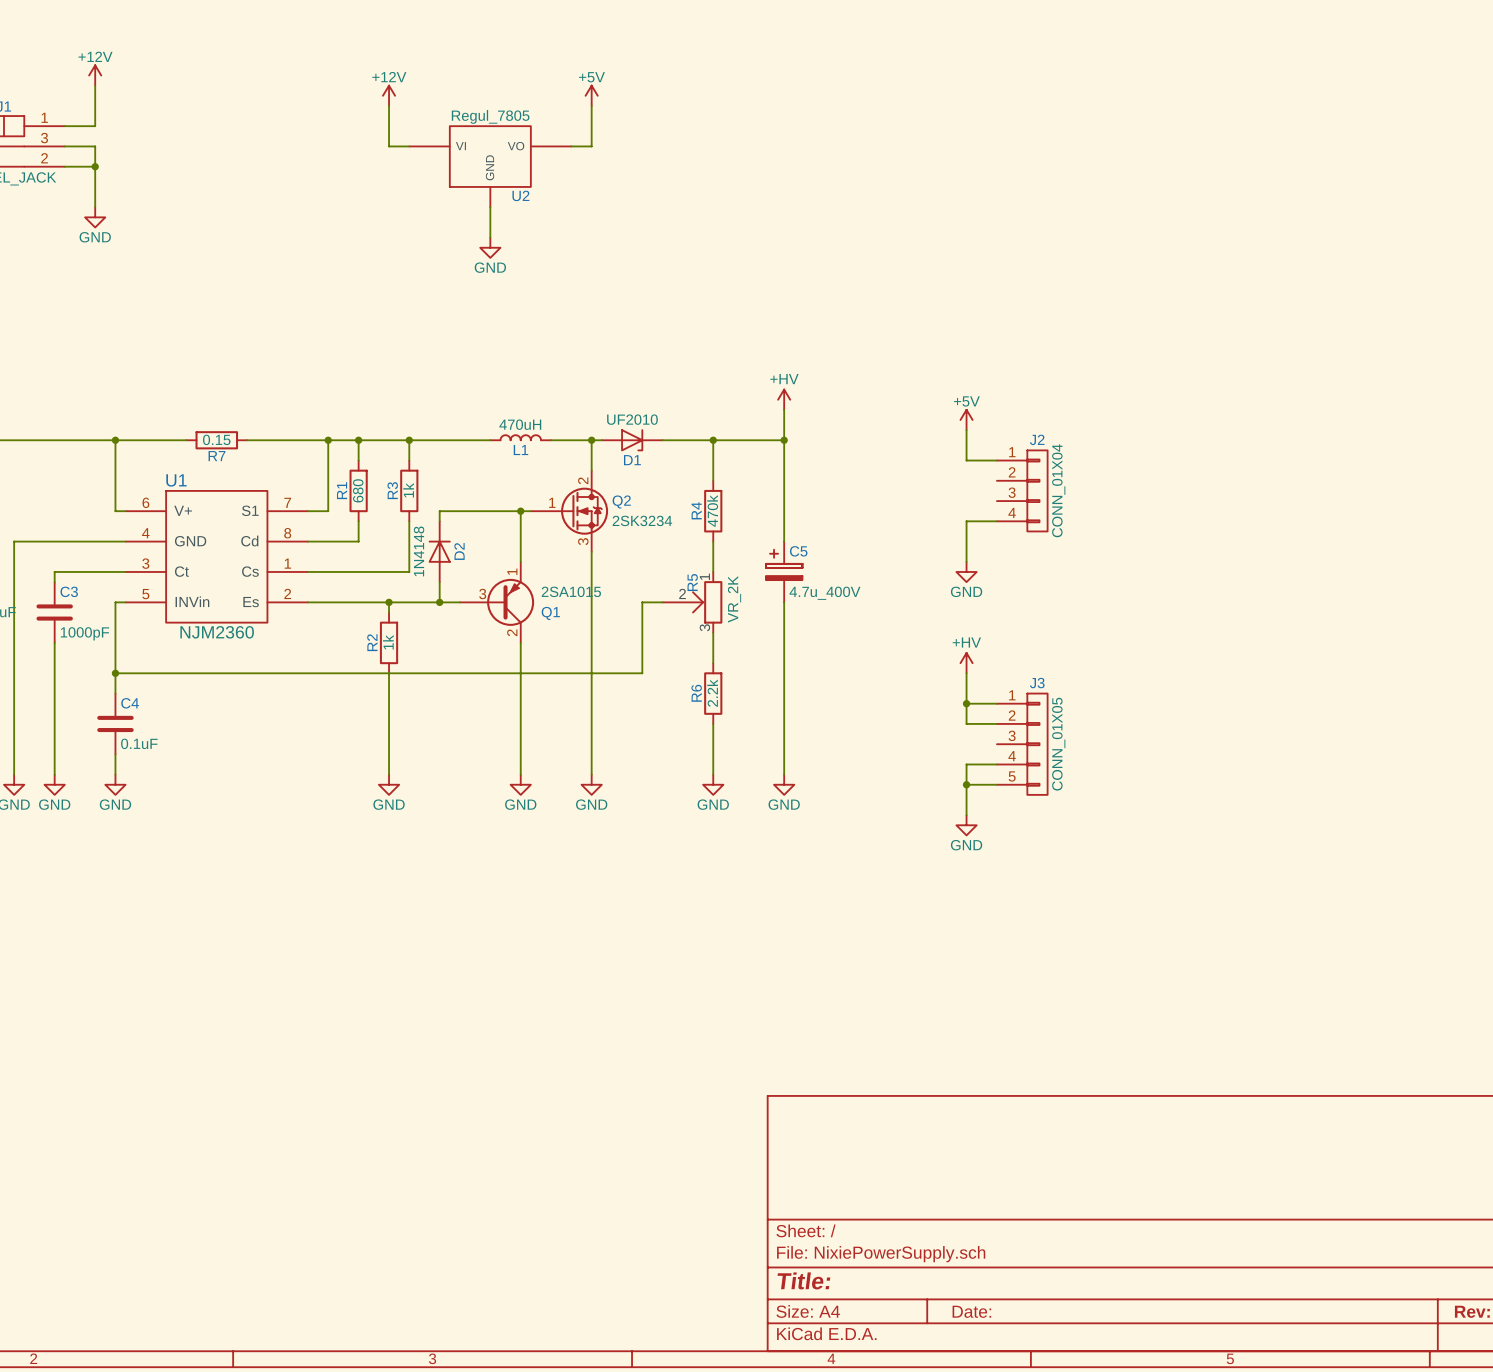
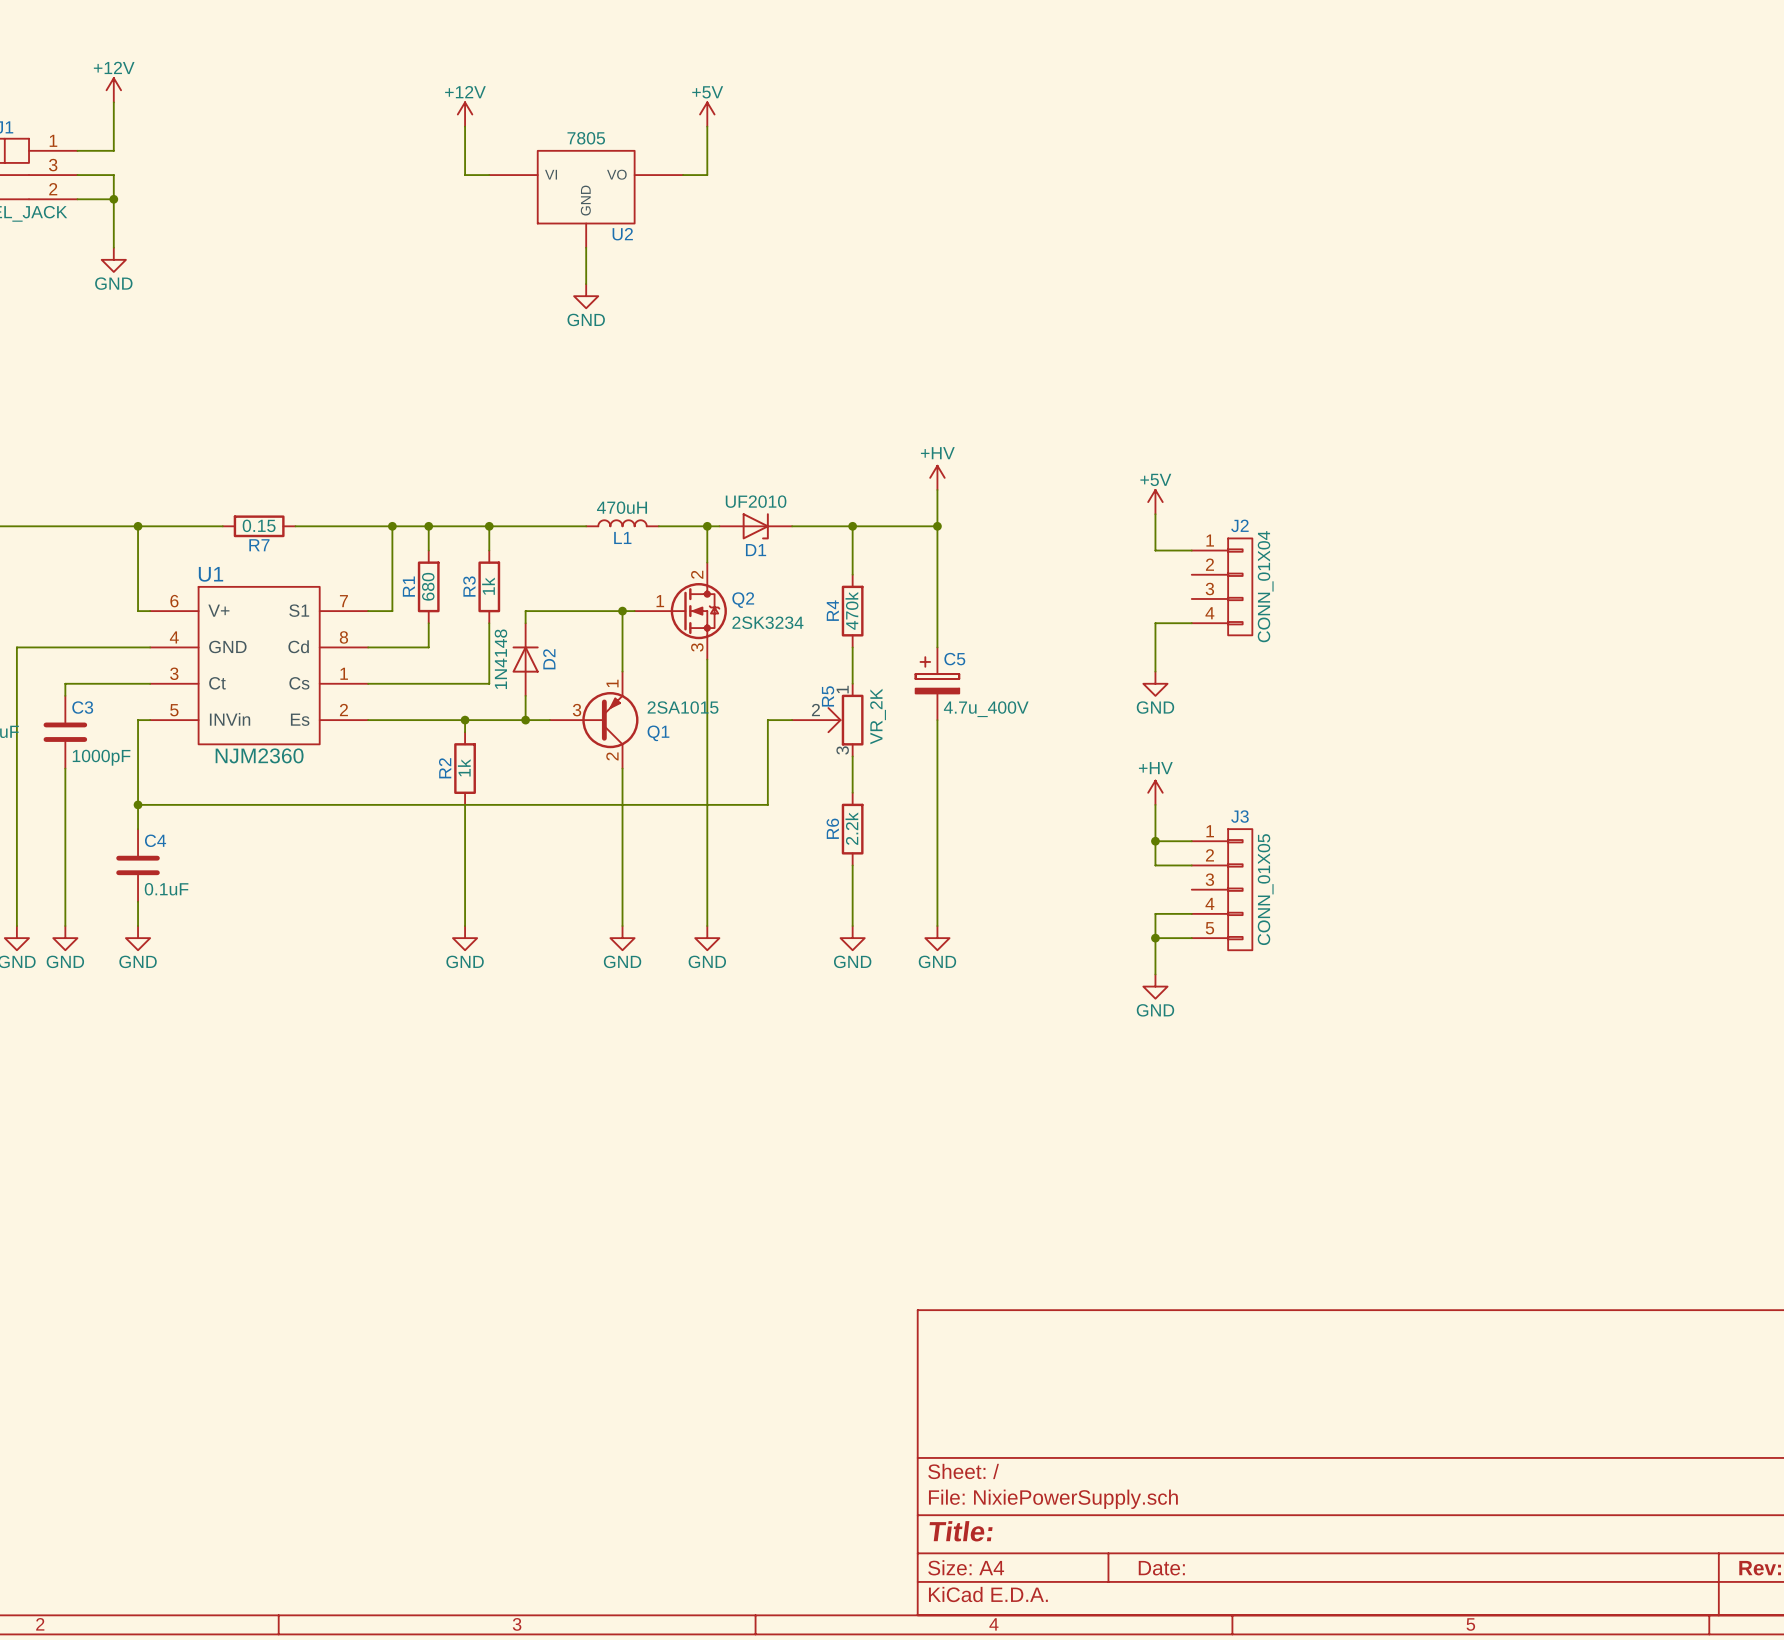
U2 value: Regul_7805 (490, 116) -> 7805 (586, 138)

